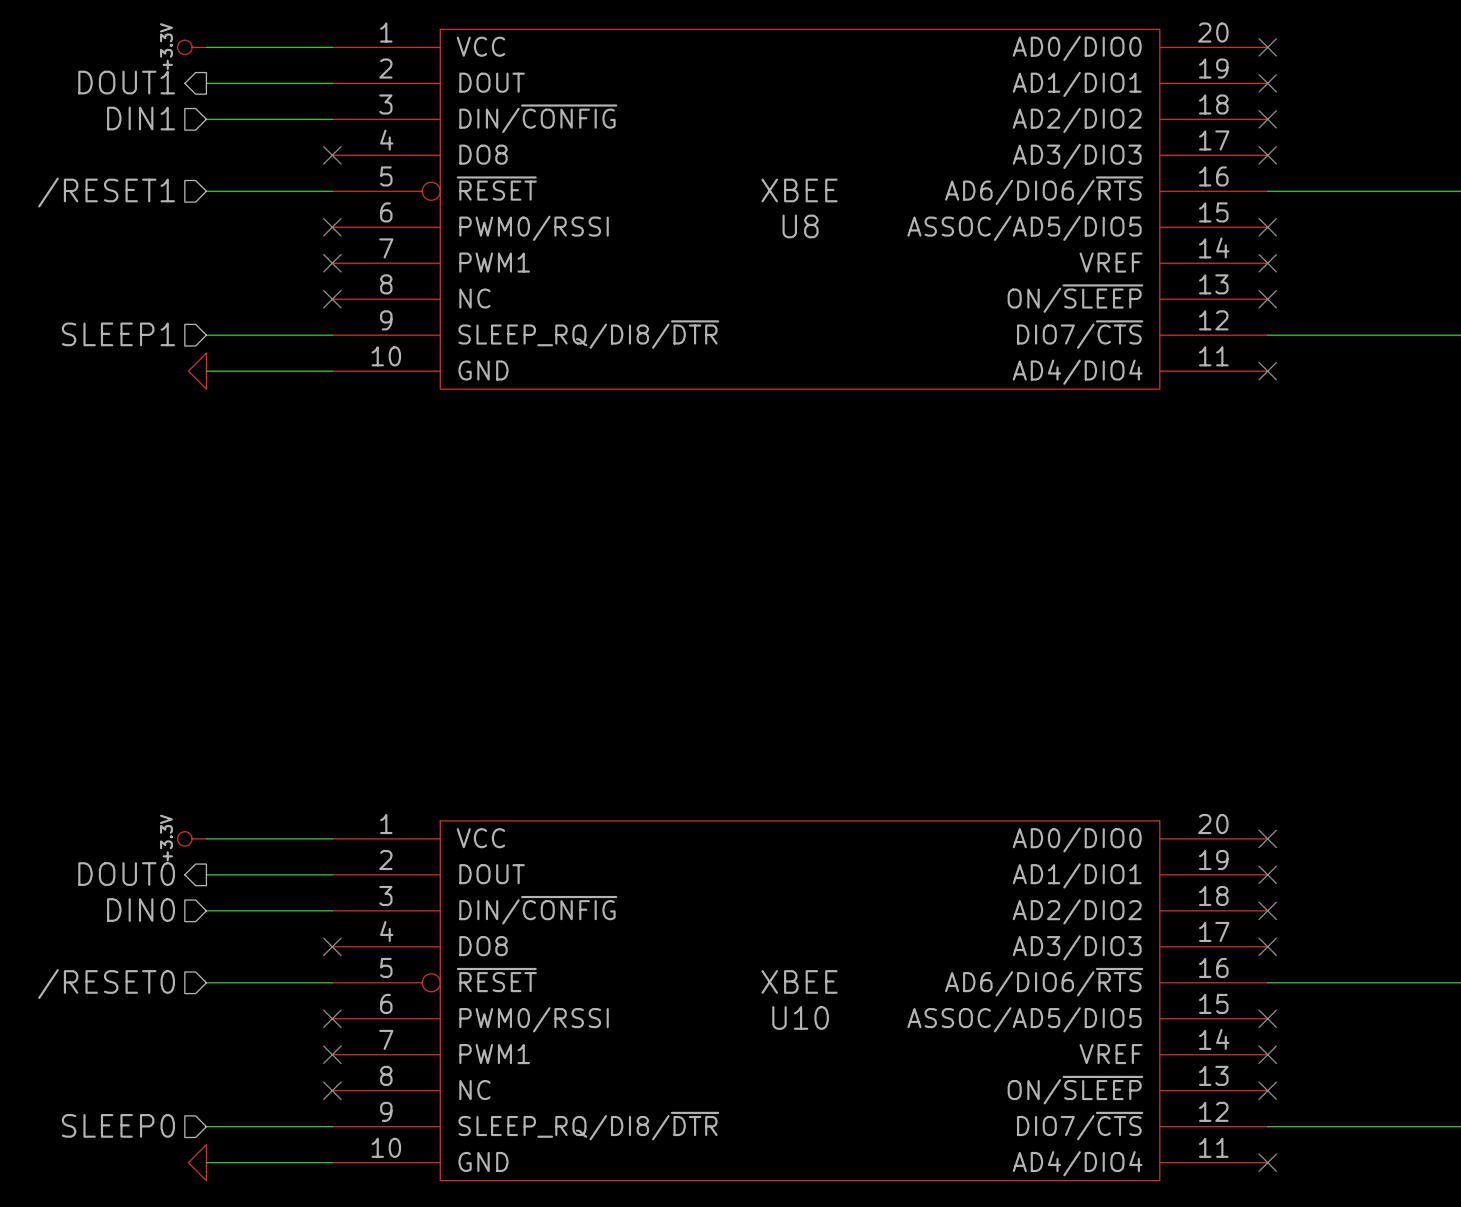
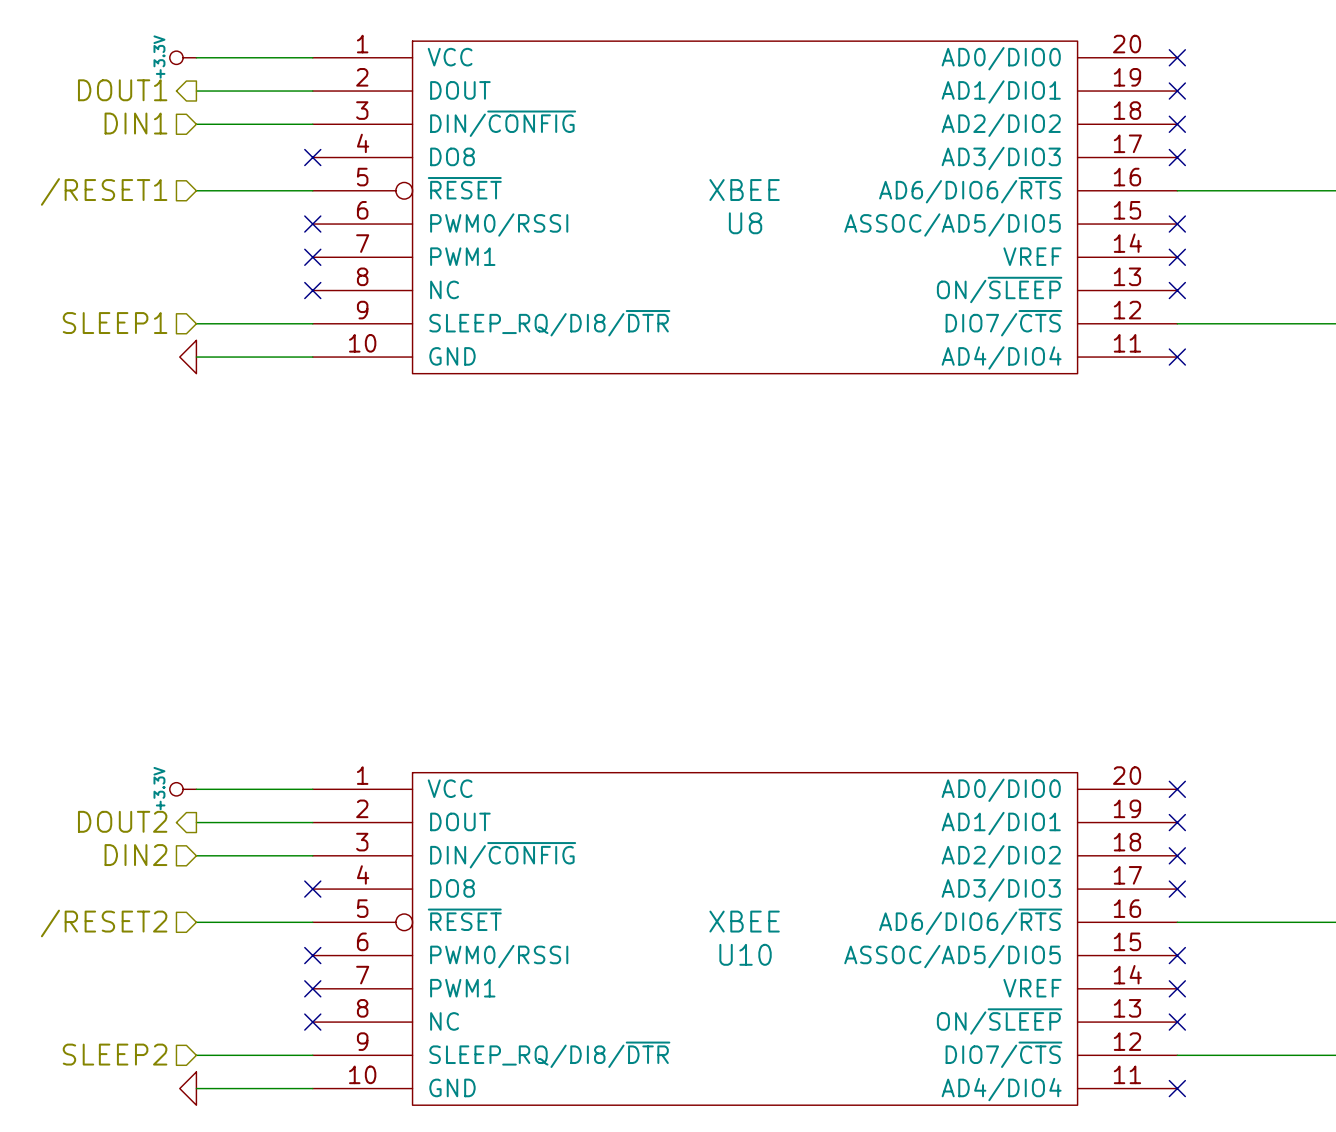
hierarchical label: DOUT0 (126, 874) -> DOUT2 (122, 821)
hierarchical label: DIN0 (141, 910) -> DIN2 (135, 855)
hierarchical label: /RESET0 (106, 984) -> /RESET2 (104, 923)
hierarchical label: SLEEP0 (118, 1125) -> SLEEP2 (115, 1054)

